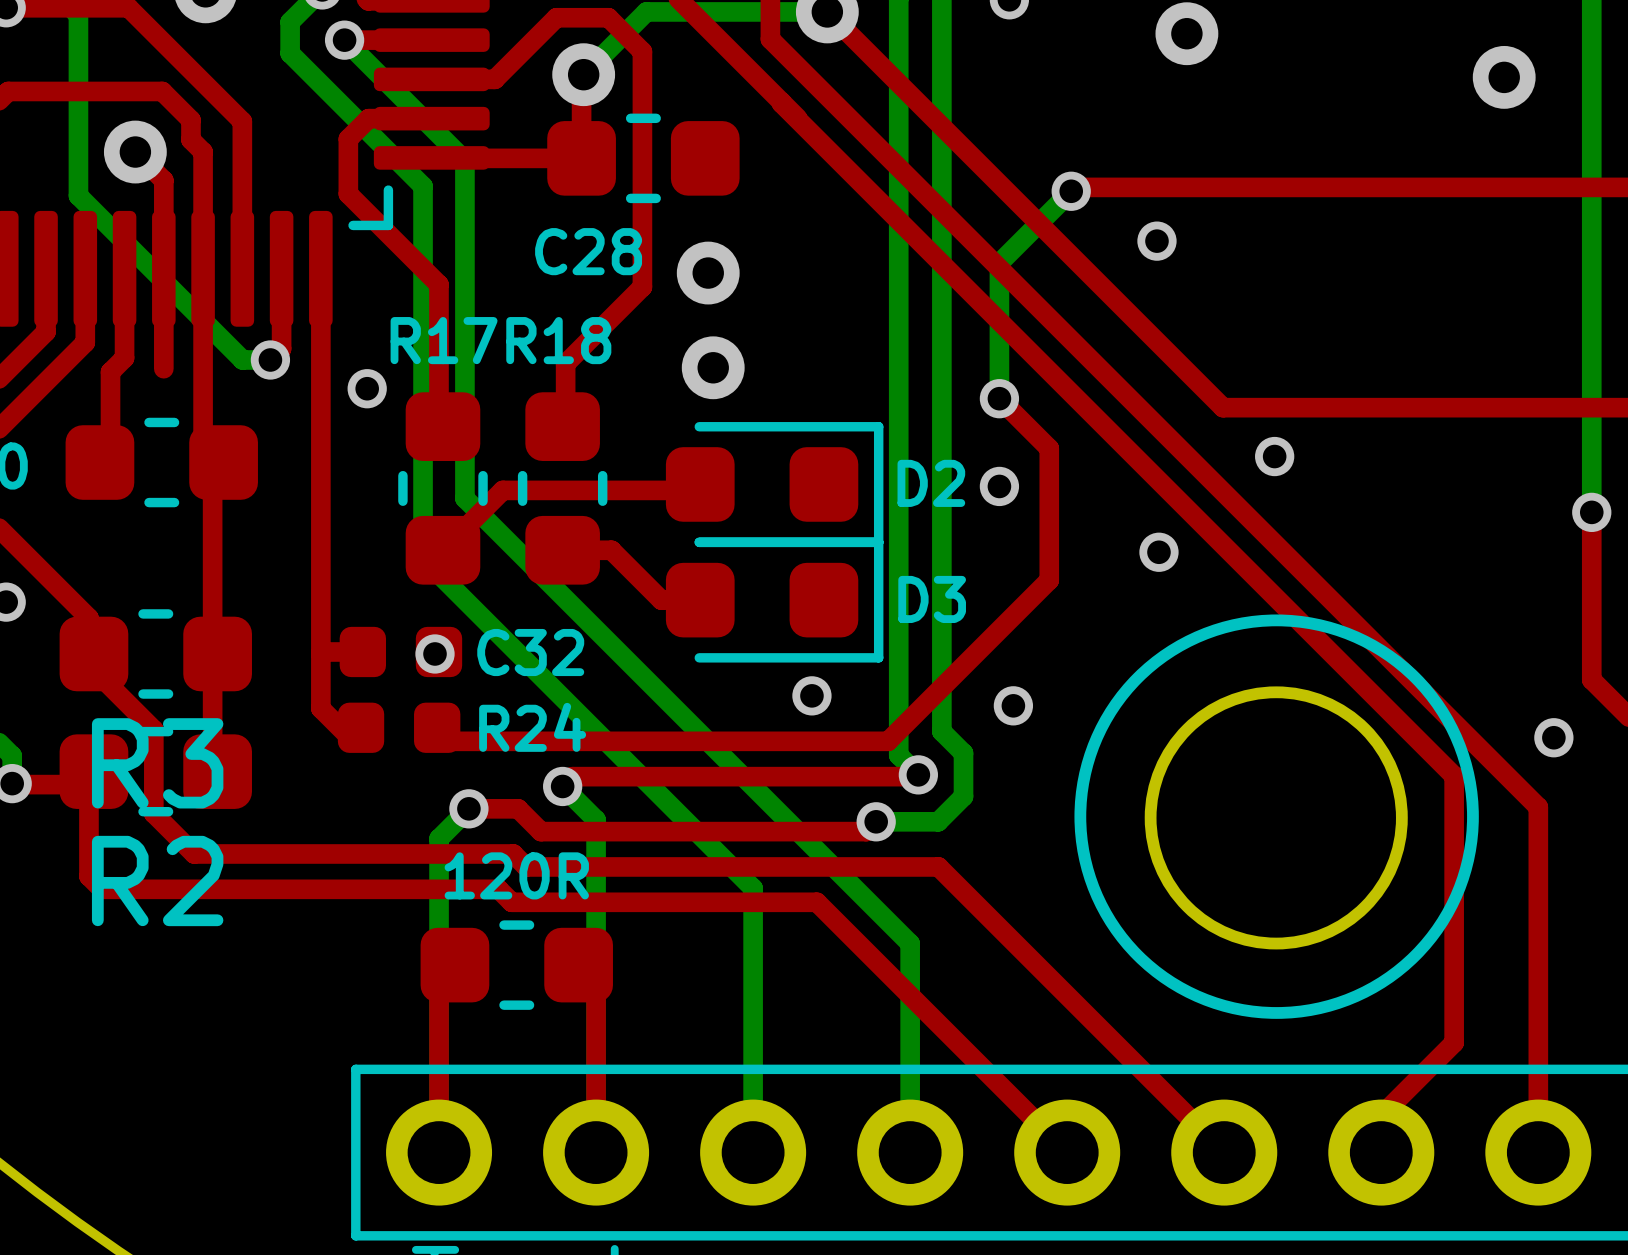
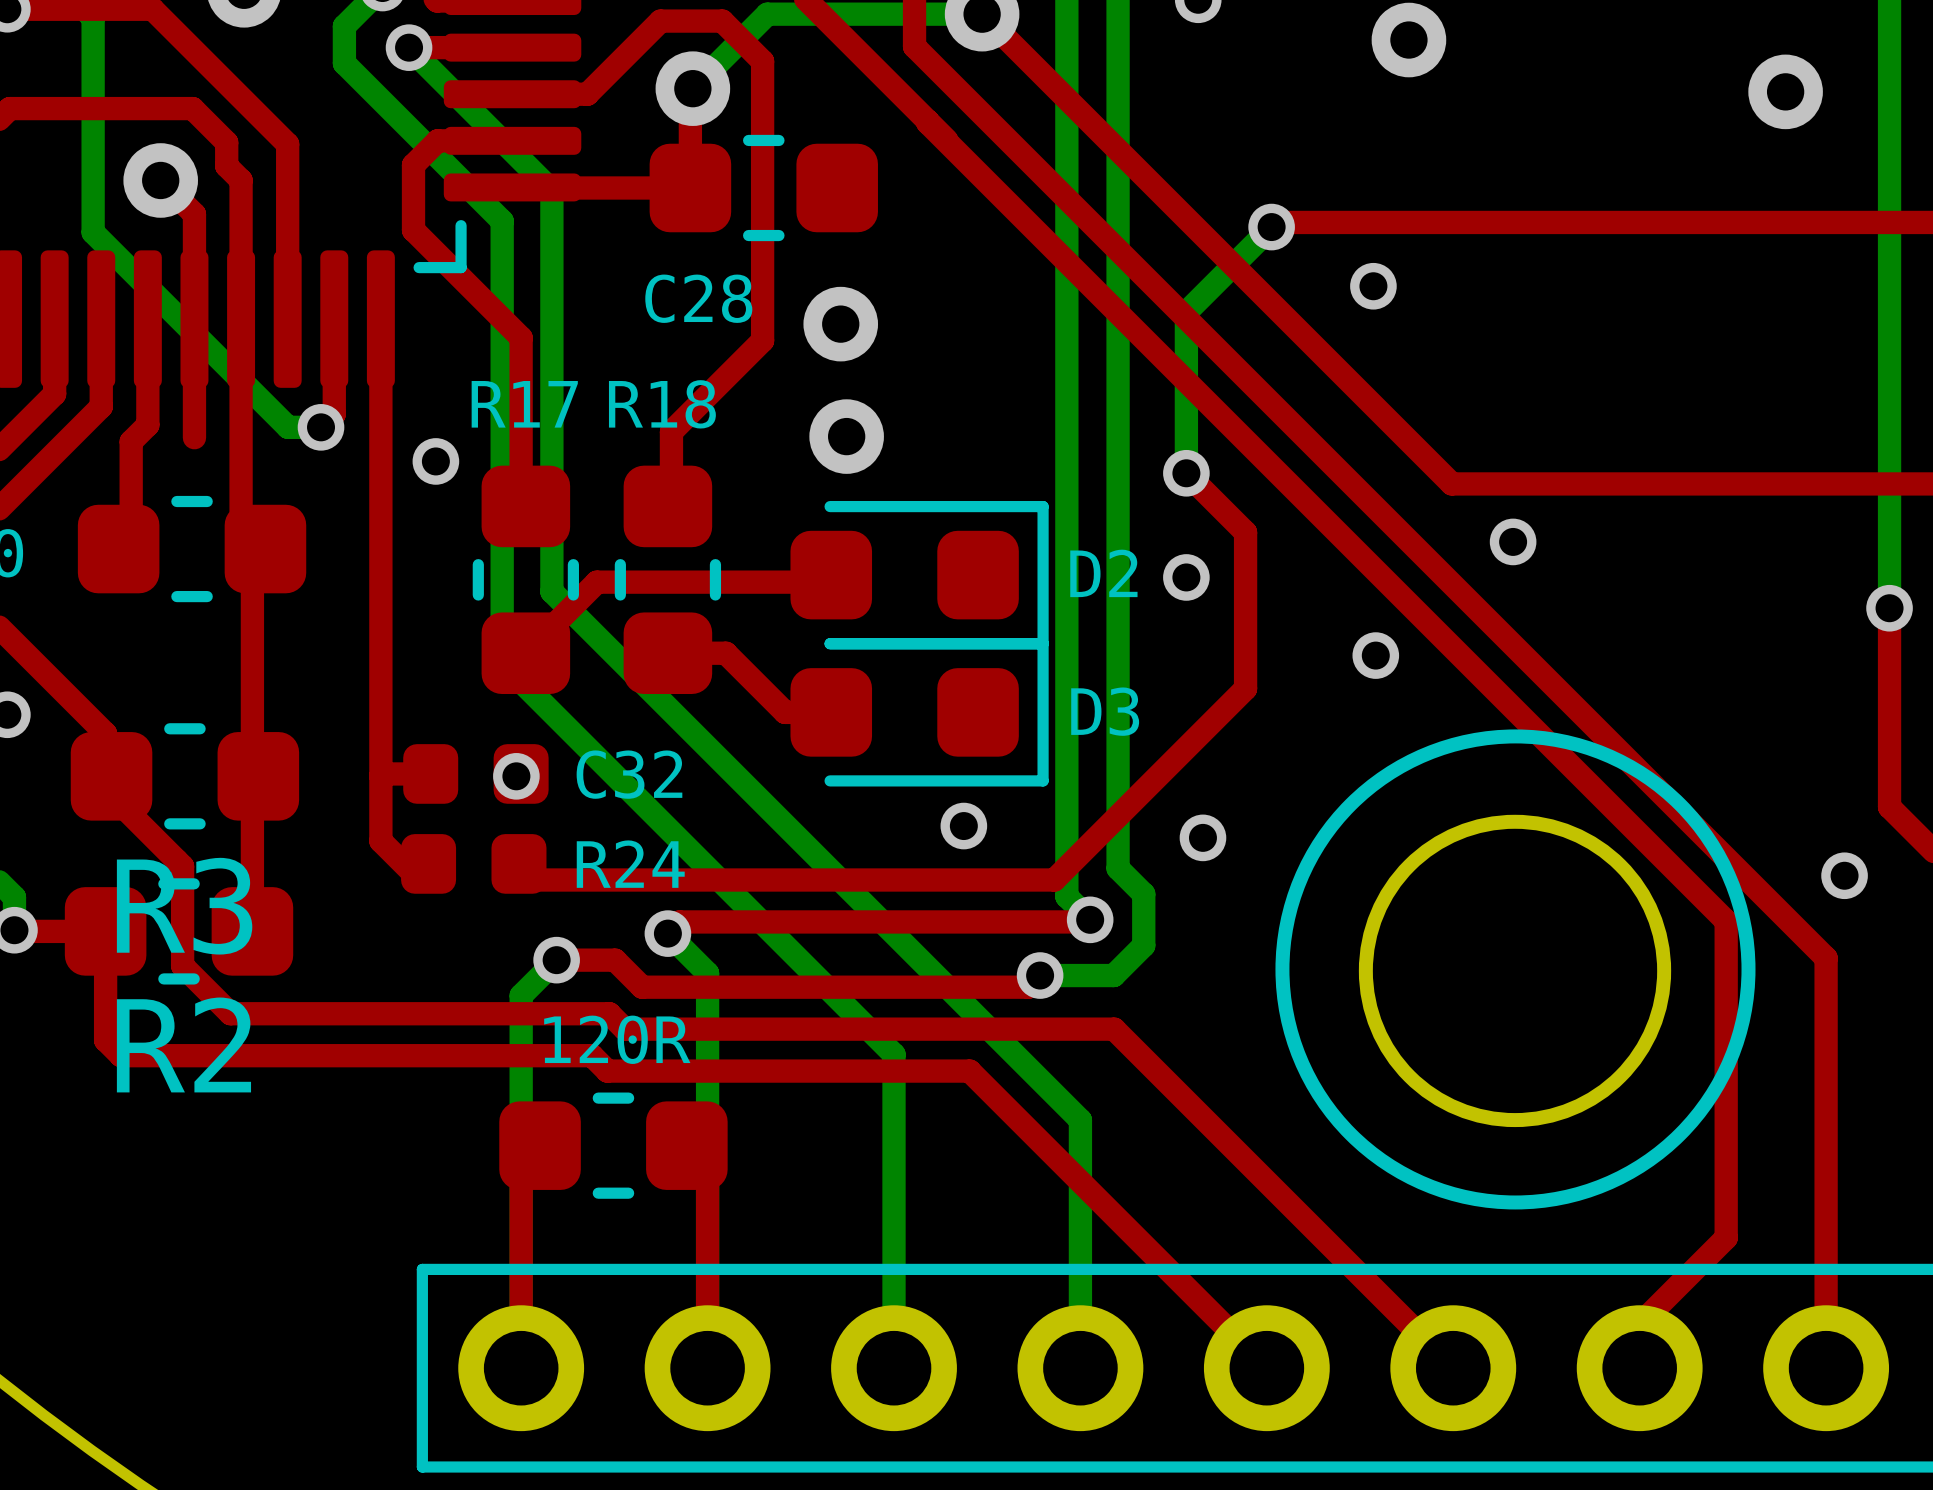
R2 position: (155, 771) -> (179, 931)

